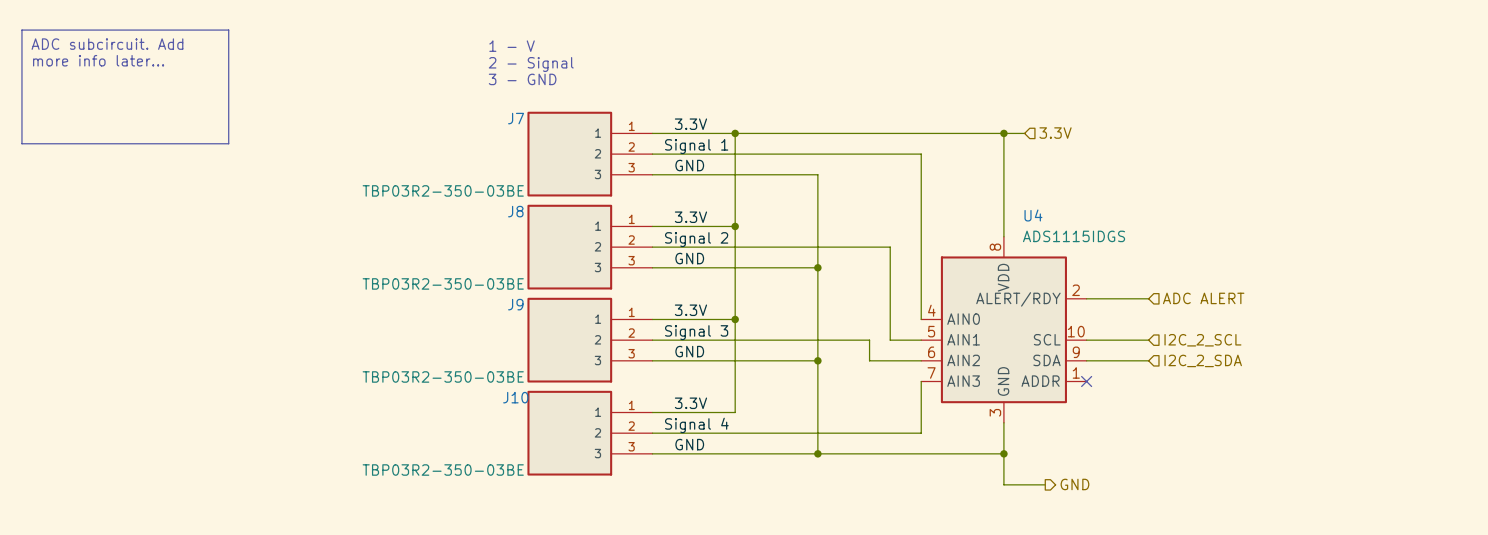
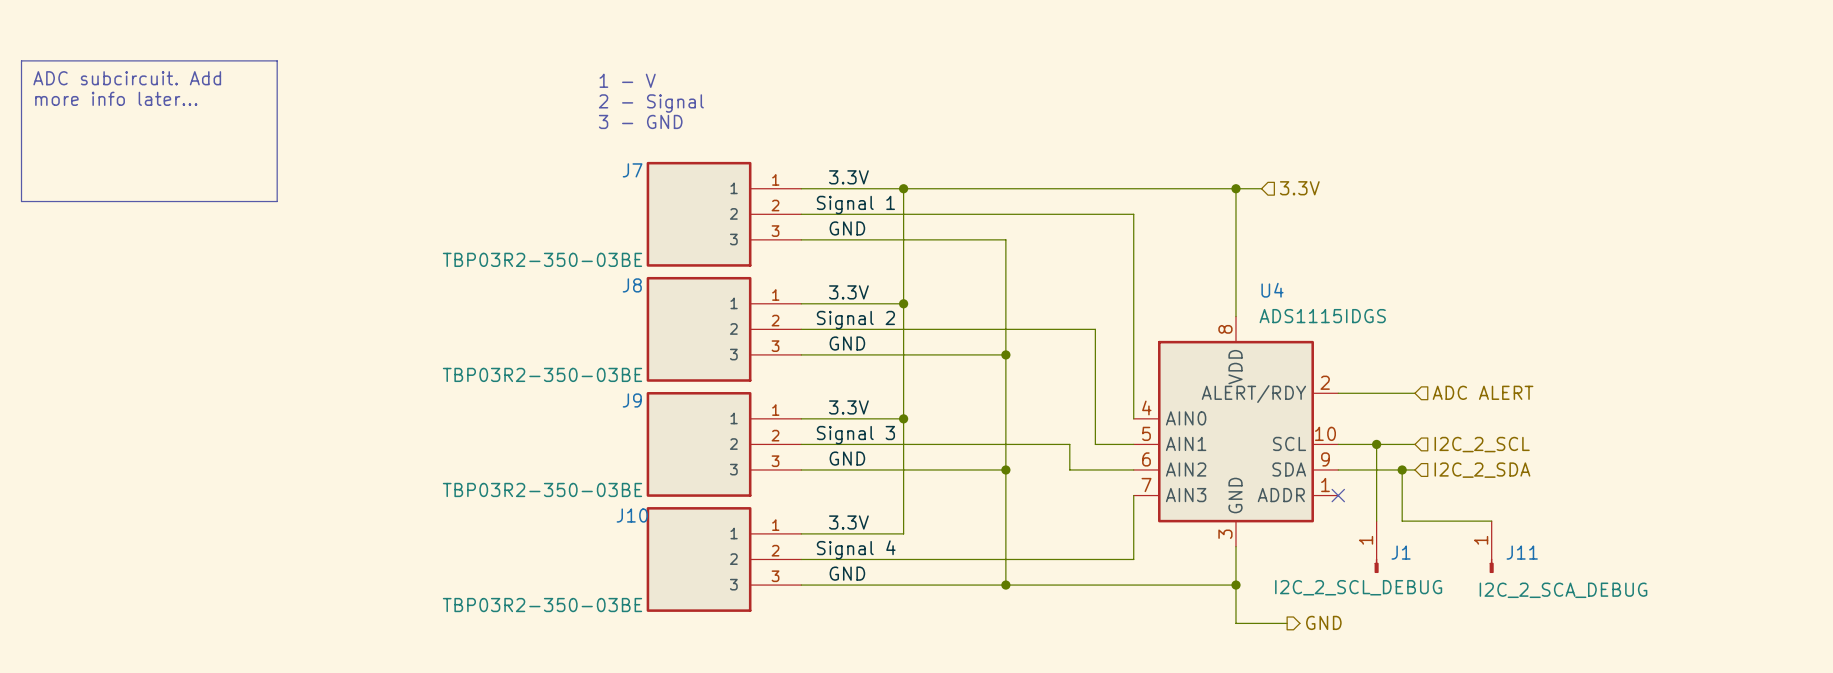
wire: none -> (1376, 444) (1376, 521)
junction: none -> (1376, 444)
wire: none -> (1402, 469) (1402, 521) (1491, 521)
junction: none -> (1402, 469)
J1: none -> I2C_2_SCL_DEBUG (1376, 547)
J11: none -> I2C_2_SCA_DEBUG (1491, 547)

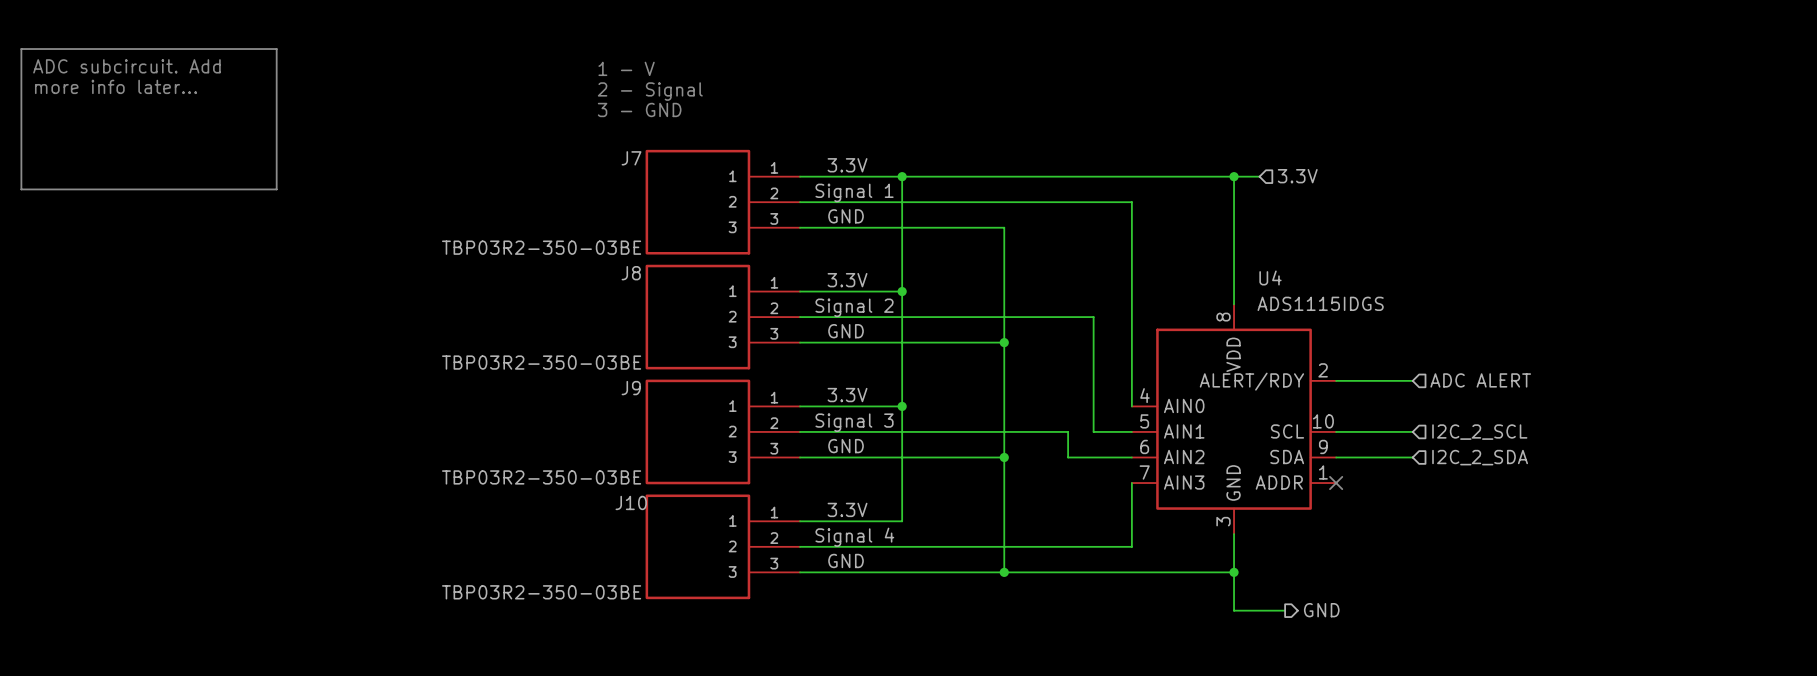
wire: (1376, 444) (1376, 521) -> none
junction: (1376, 444) -> none
wire: (1402, 469) (1402, 521) (1491, 521) -> none
junction: (1402, 469) -> none
J1: I2C_2_SCL_DEBUG (1376, 547) -> none
J11: I2C_2_SCA_DEBUG (1491, 547) -> none

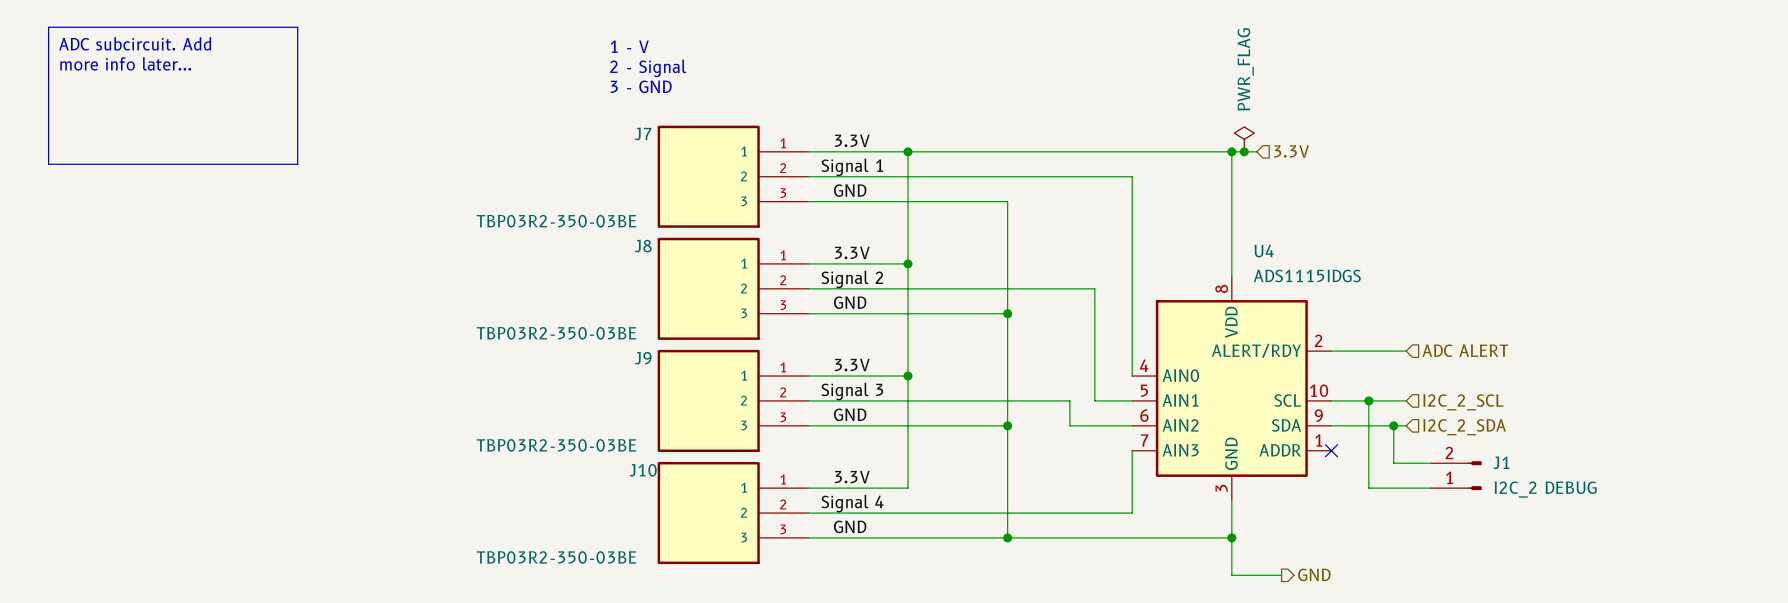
power symbol: none -> PWR_FLAG (1244, 139)
junction: none -> (1244, 151)
wire: none -> (1368, 400) (1368, 488) (1431, 488)
junction: none -> (1368, 400)
wire: none -> (1393, 425) (1393, 463) (1431, 463)
junction: none -> (1393, 425)
J1: none -> I2C_2 DEBUG (1456, 475)

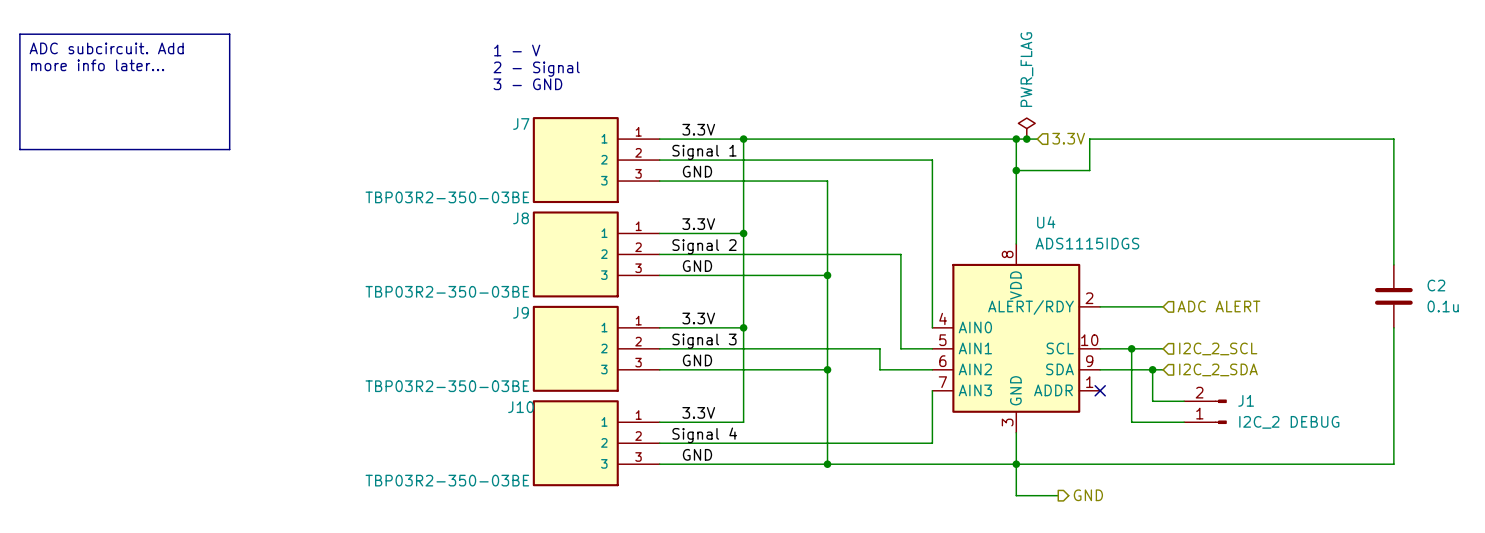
wire: none -> (1016, 170) (1089, 170) (1089, 139) (1393, 139) (1393, 264)
junction: none -> (1016, 170)
C2: none -> 0.1u (1393, 296)
wire: none -> (1393, 327) (1393, 464) (1016, 464)

